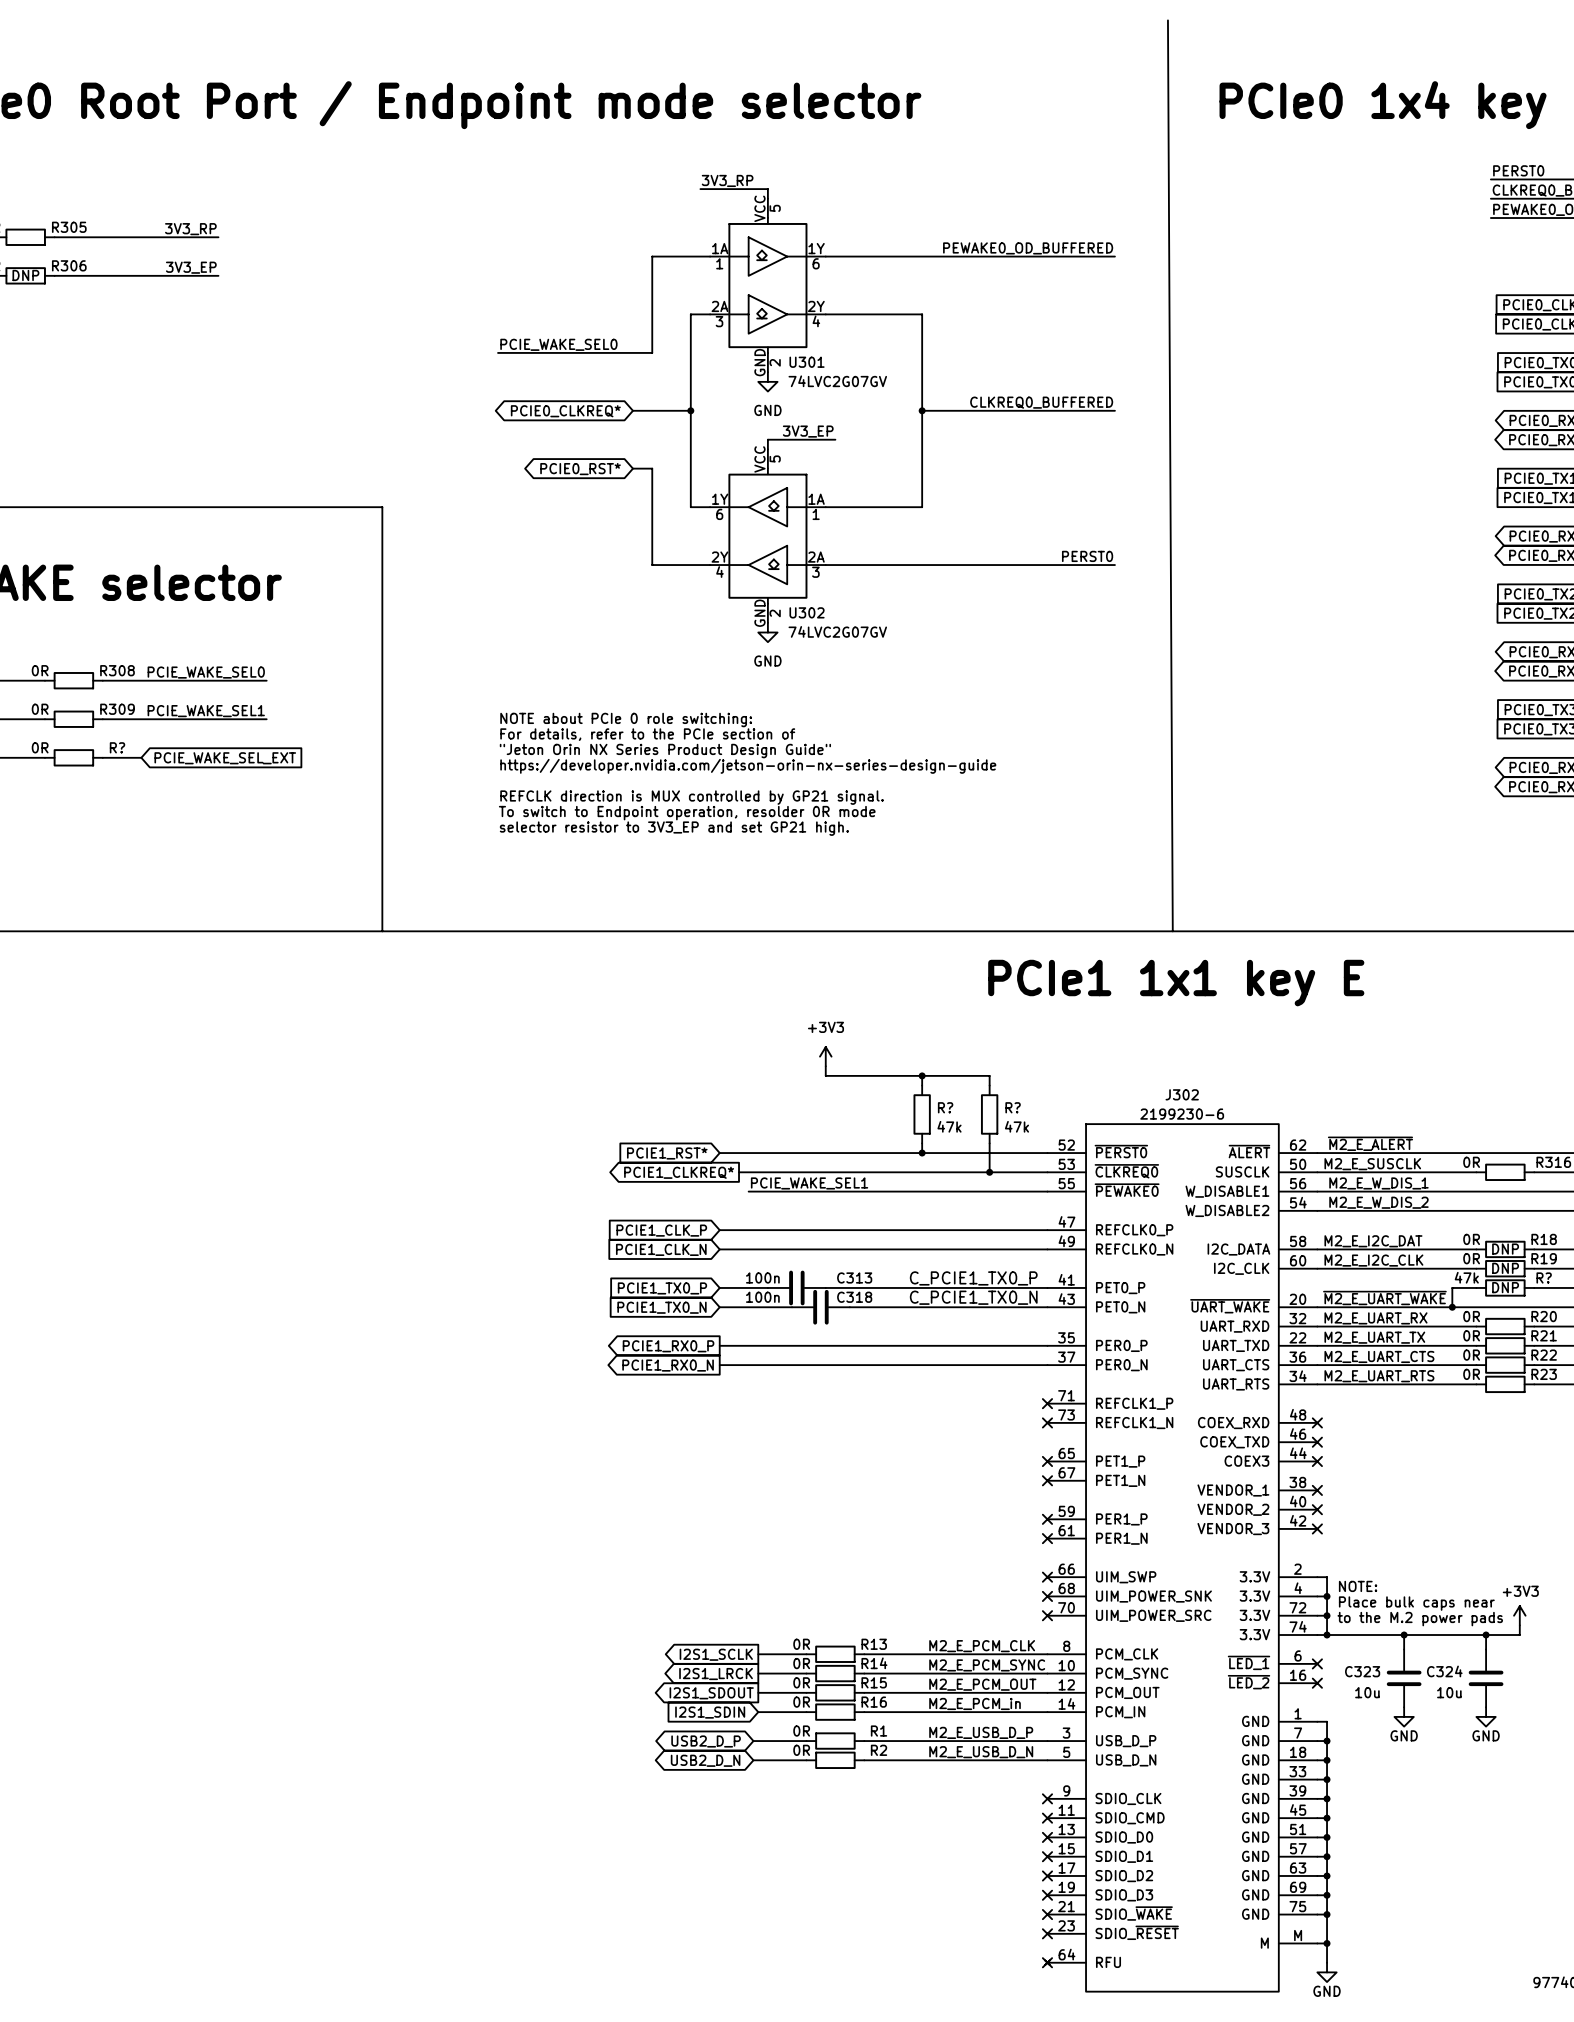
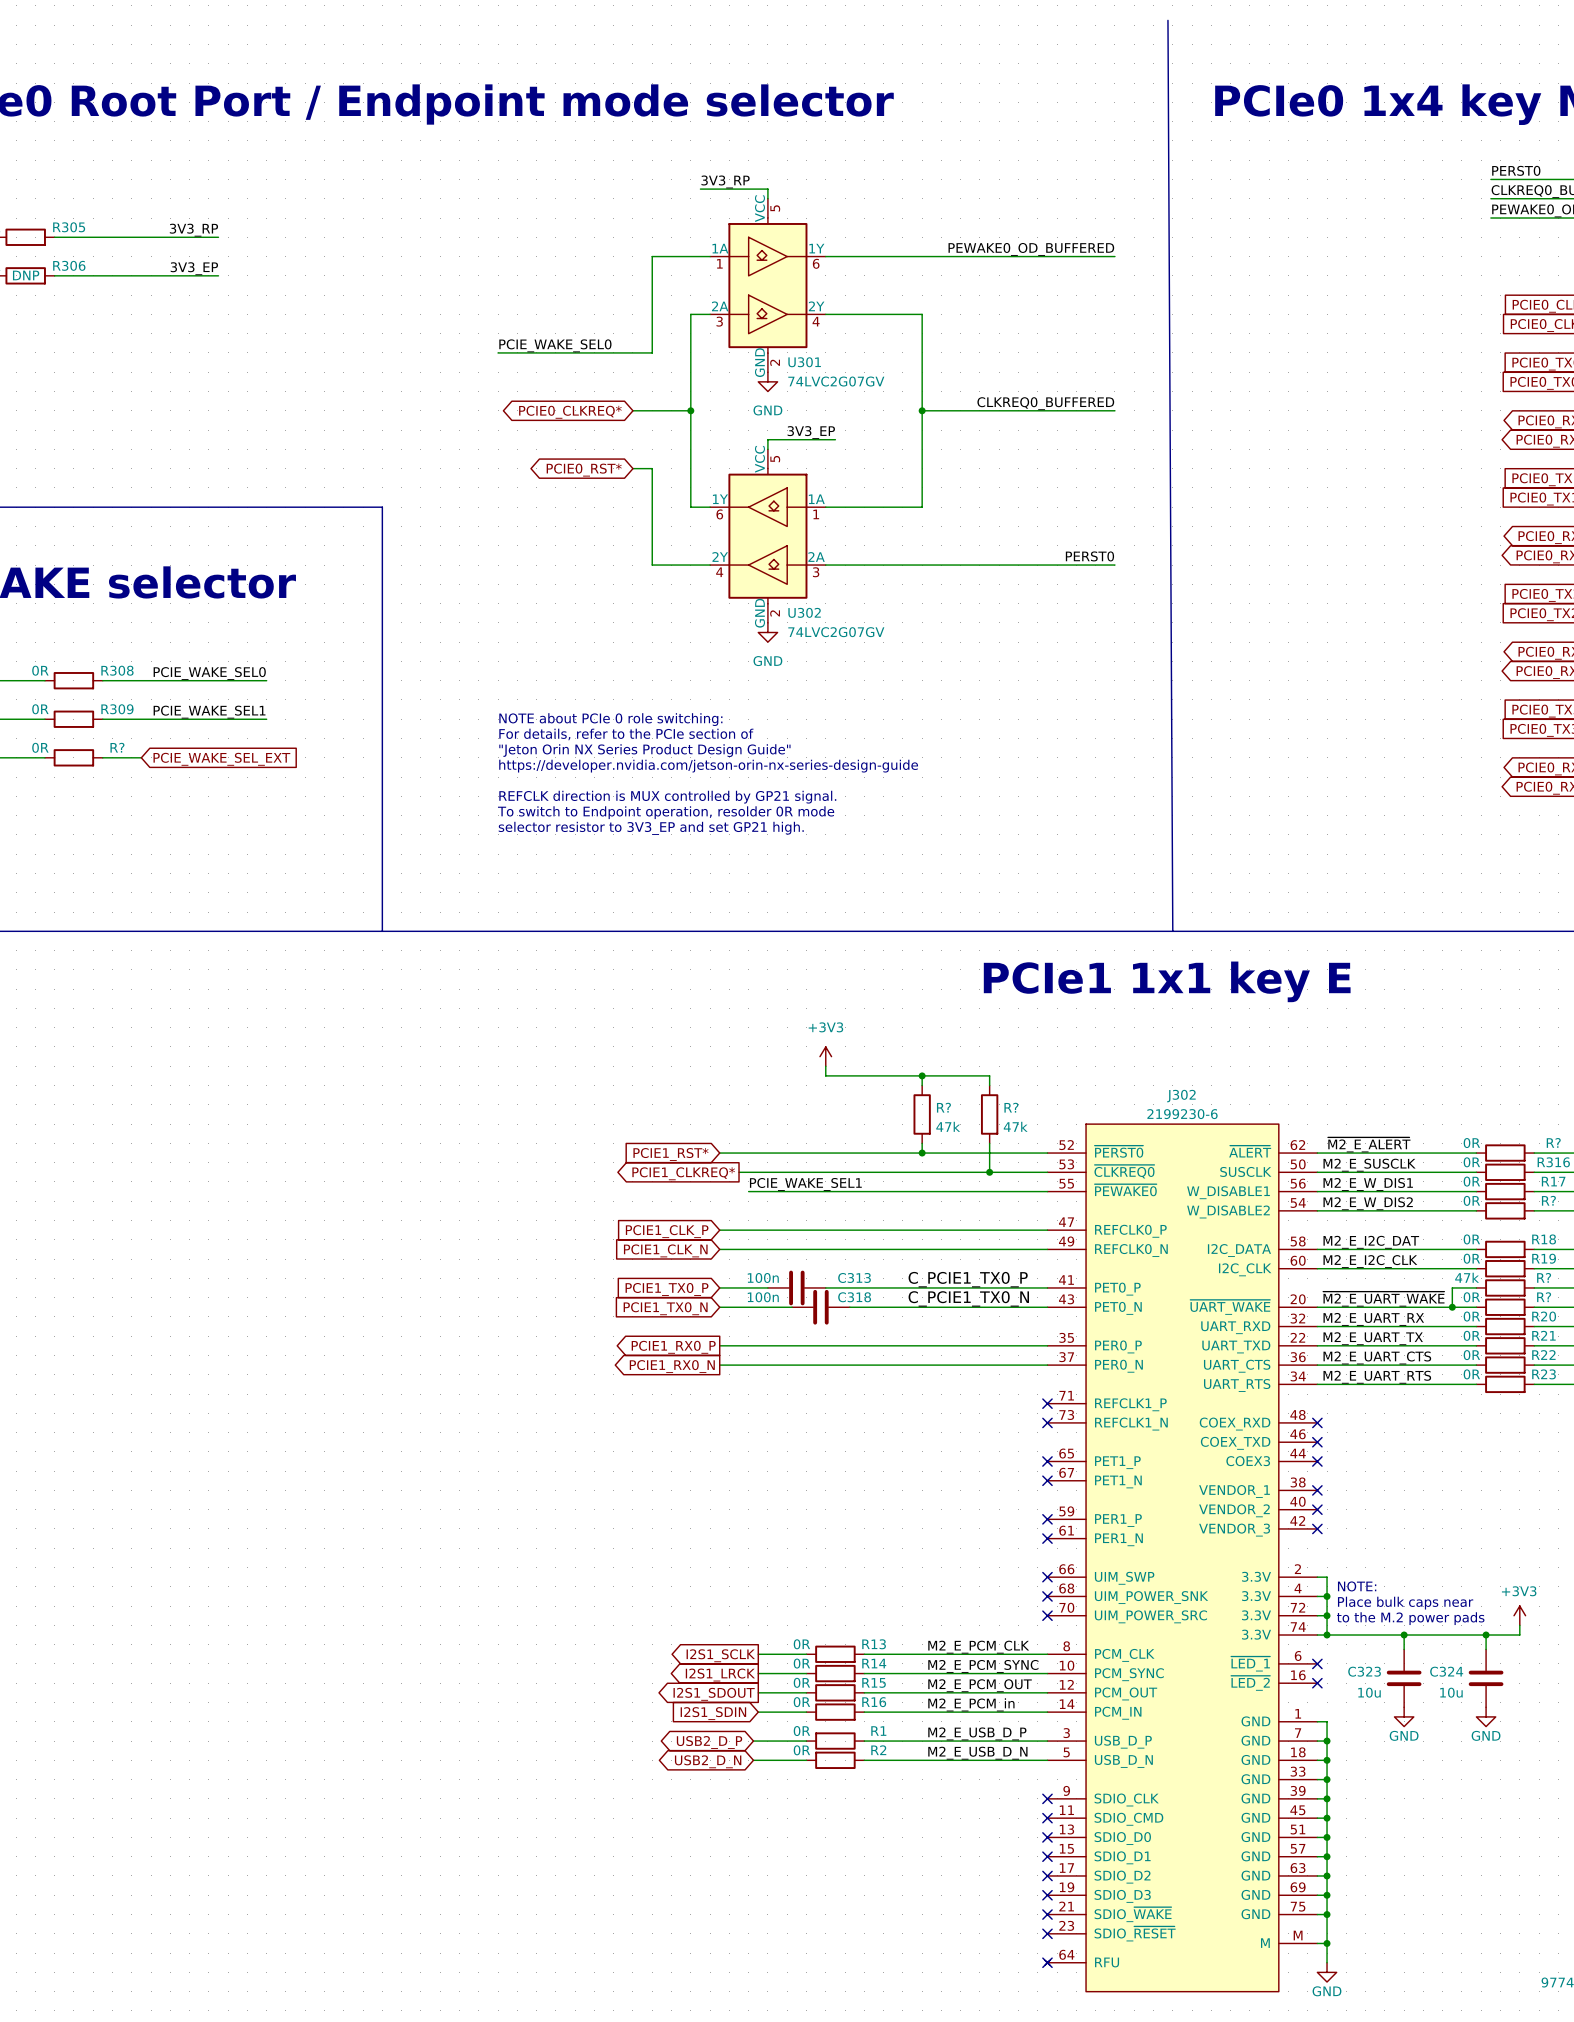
wire: (1476, 1153) (1534, 1153) -> none
R?: none -> (1505, 1153)
label: M2_E_W_DIS_1 (1378, 1183) -> M2_E_W_DIS1 (1368, 1184)
wire: (1476, 1191) (1534, 1191) -> none
R17: none -> (1505, 1191)
label: M2_E_W_DIS_2 (1378, 1202) -> M2_E_W_DIS2 (1368, 1203)
wire: (1476, 1210) (1534, 1210) -> none
R?: none -> (1505, 1210)
R18 text: DNP (1505, 1249) -> none
R19 text: DNP (1505, 1268) -> none
R? text: DNP (1505, 1287) -> none
wire: (1476, 1307) (1534, 1307) -> none
R?: none -> (1505, 1307)

